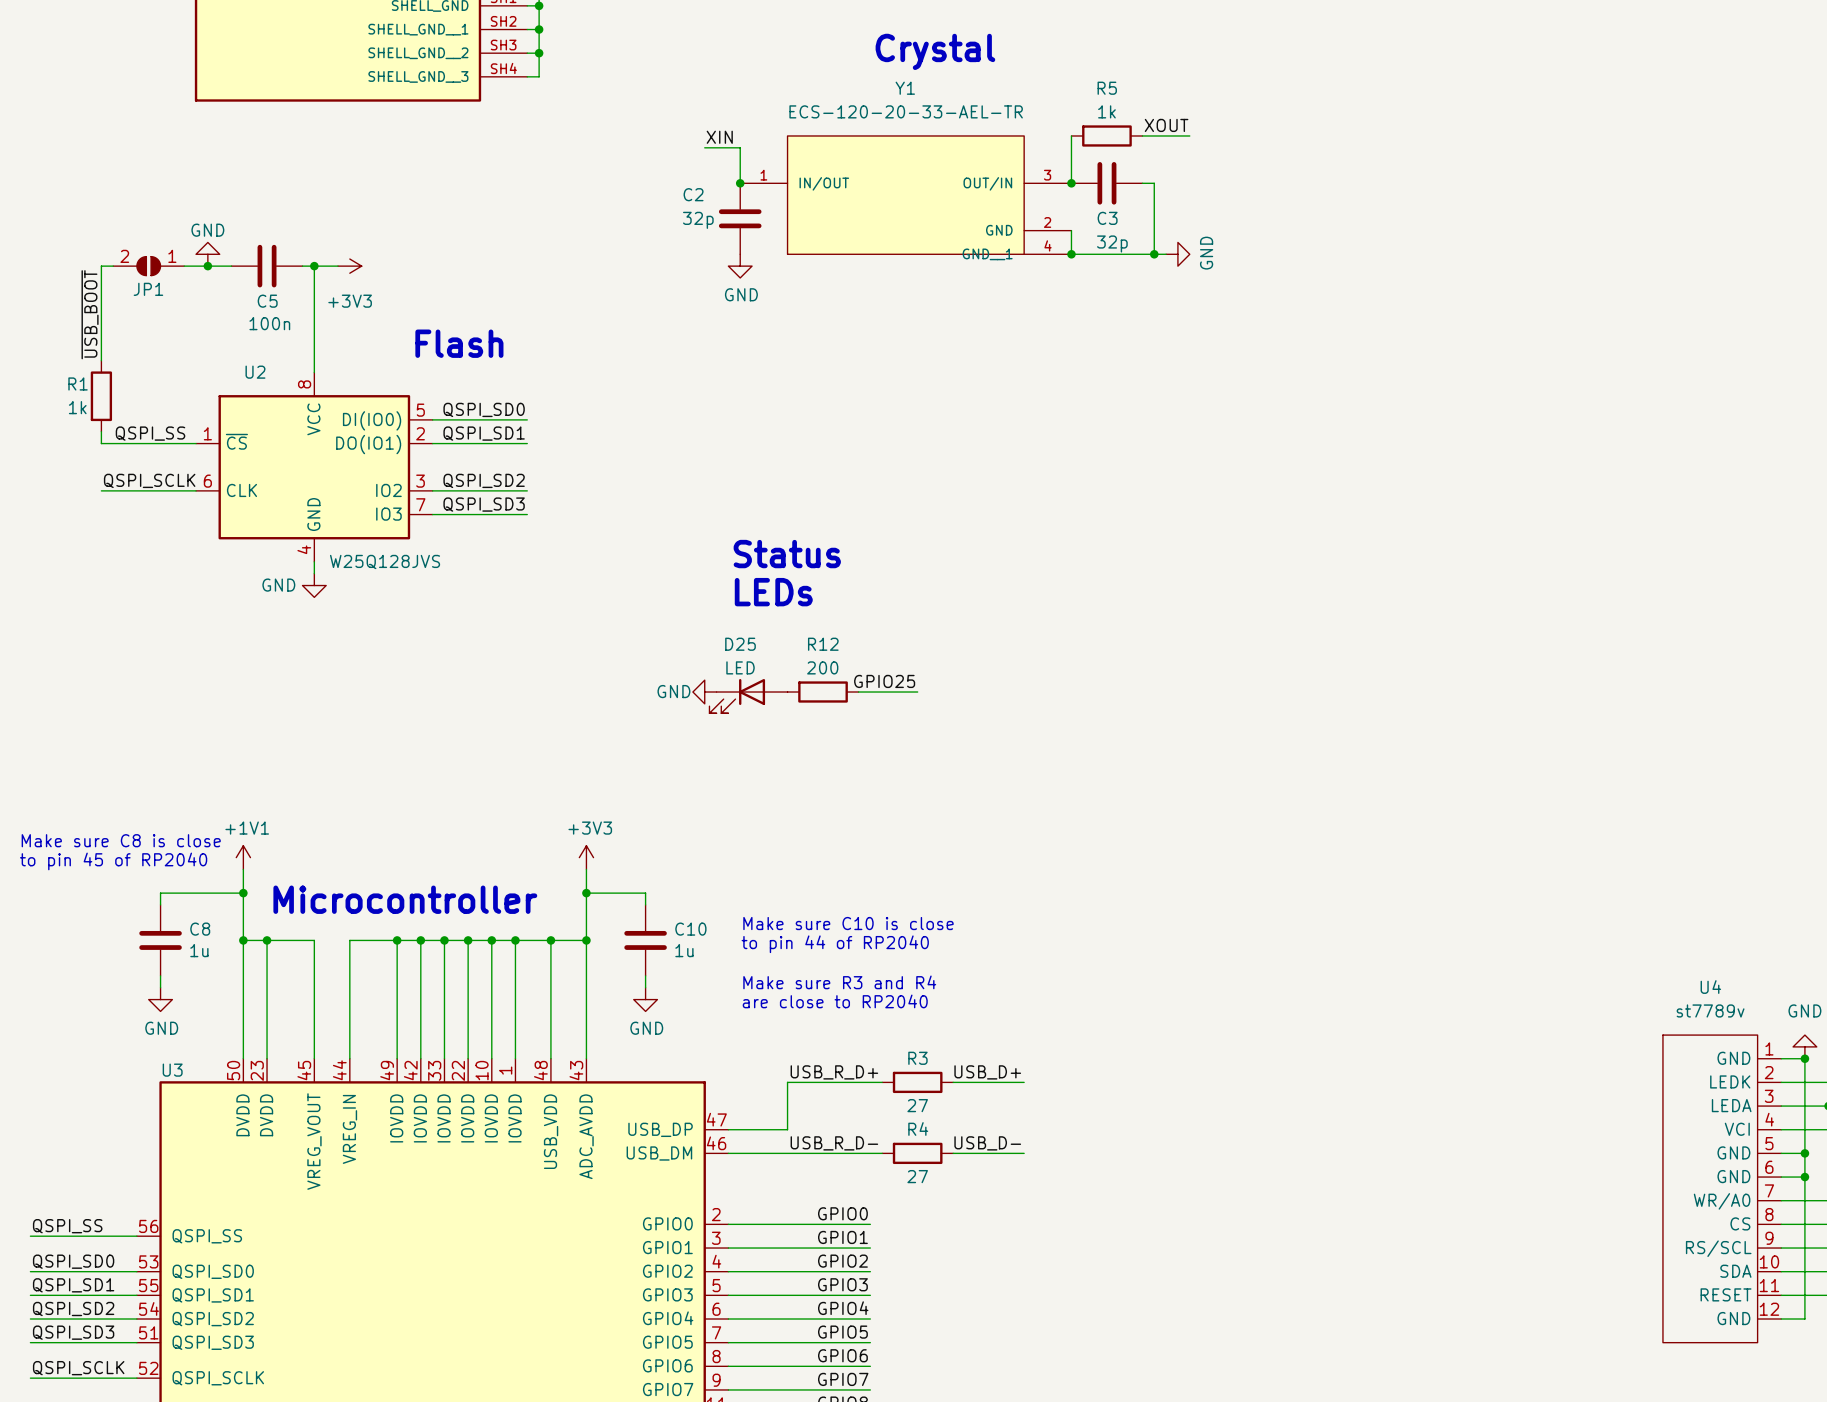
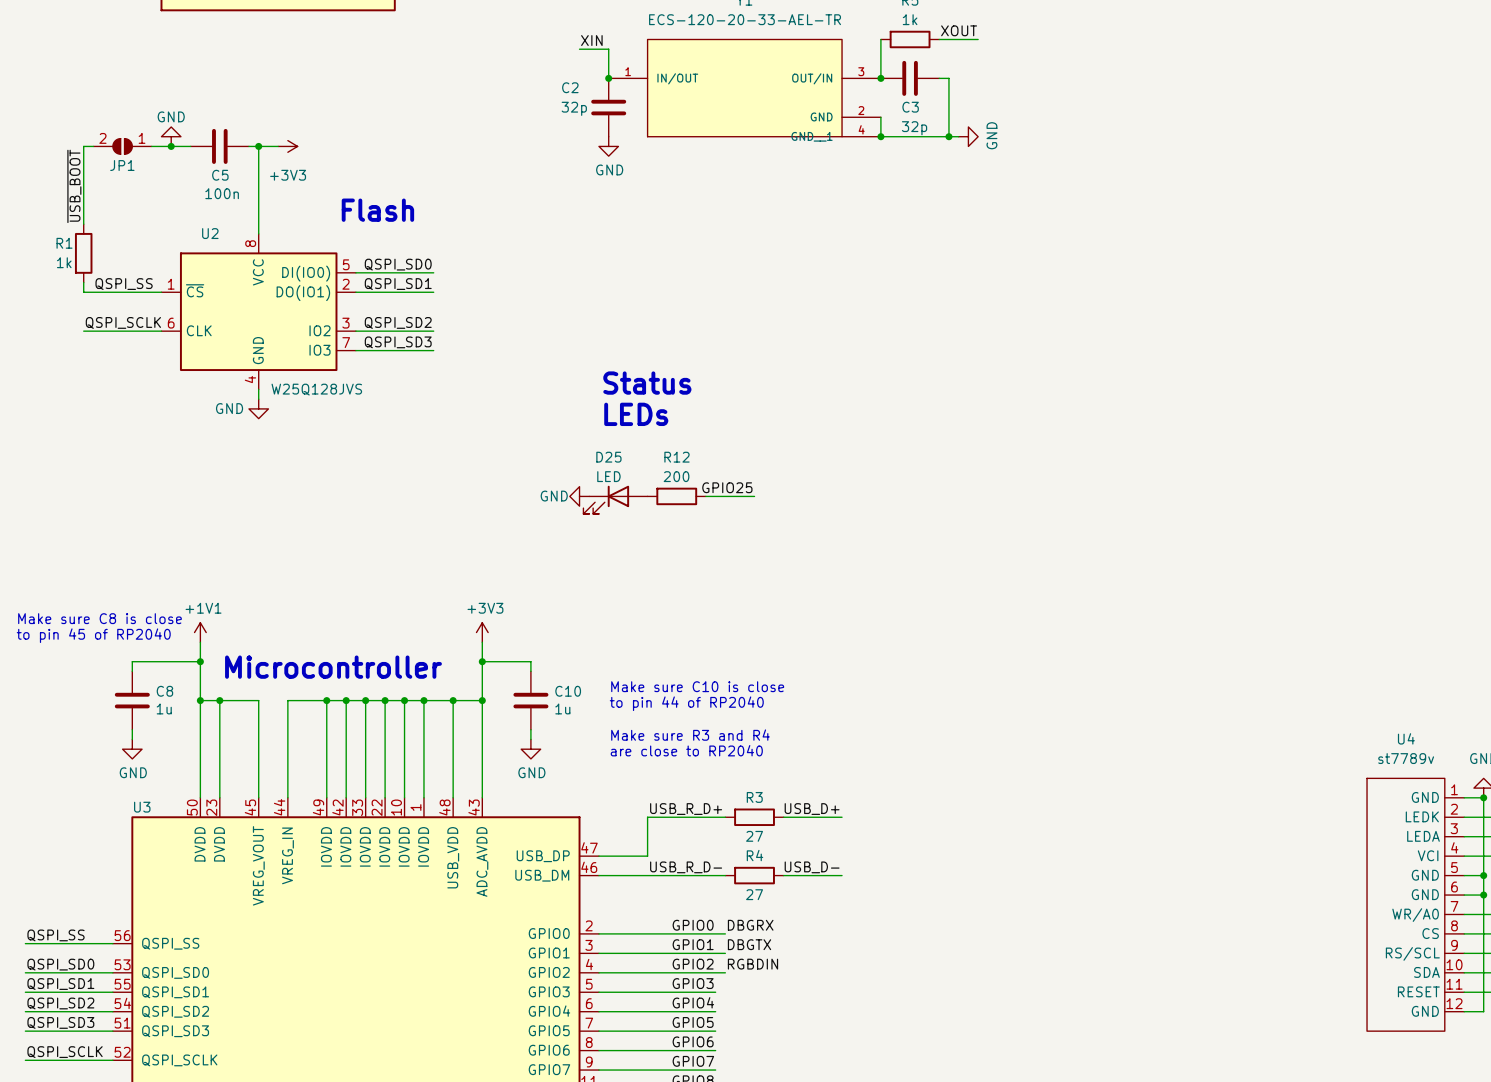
label: none -> DBGRX (750, 925)
wire: none -> (715, 933) (725, 933)
label: none -> DBGTX (749, 944)
wire: none -> (715, 953) (725, 953)
label: none -> RGBDIN (752, 964)
wire: none -> (715, 972) (725, 972)

